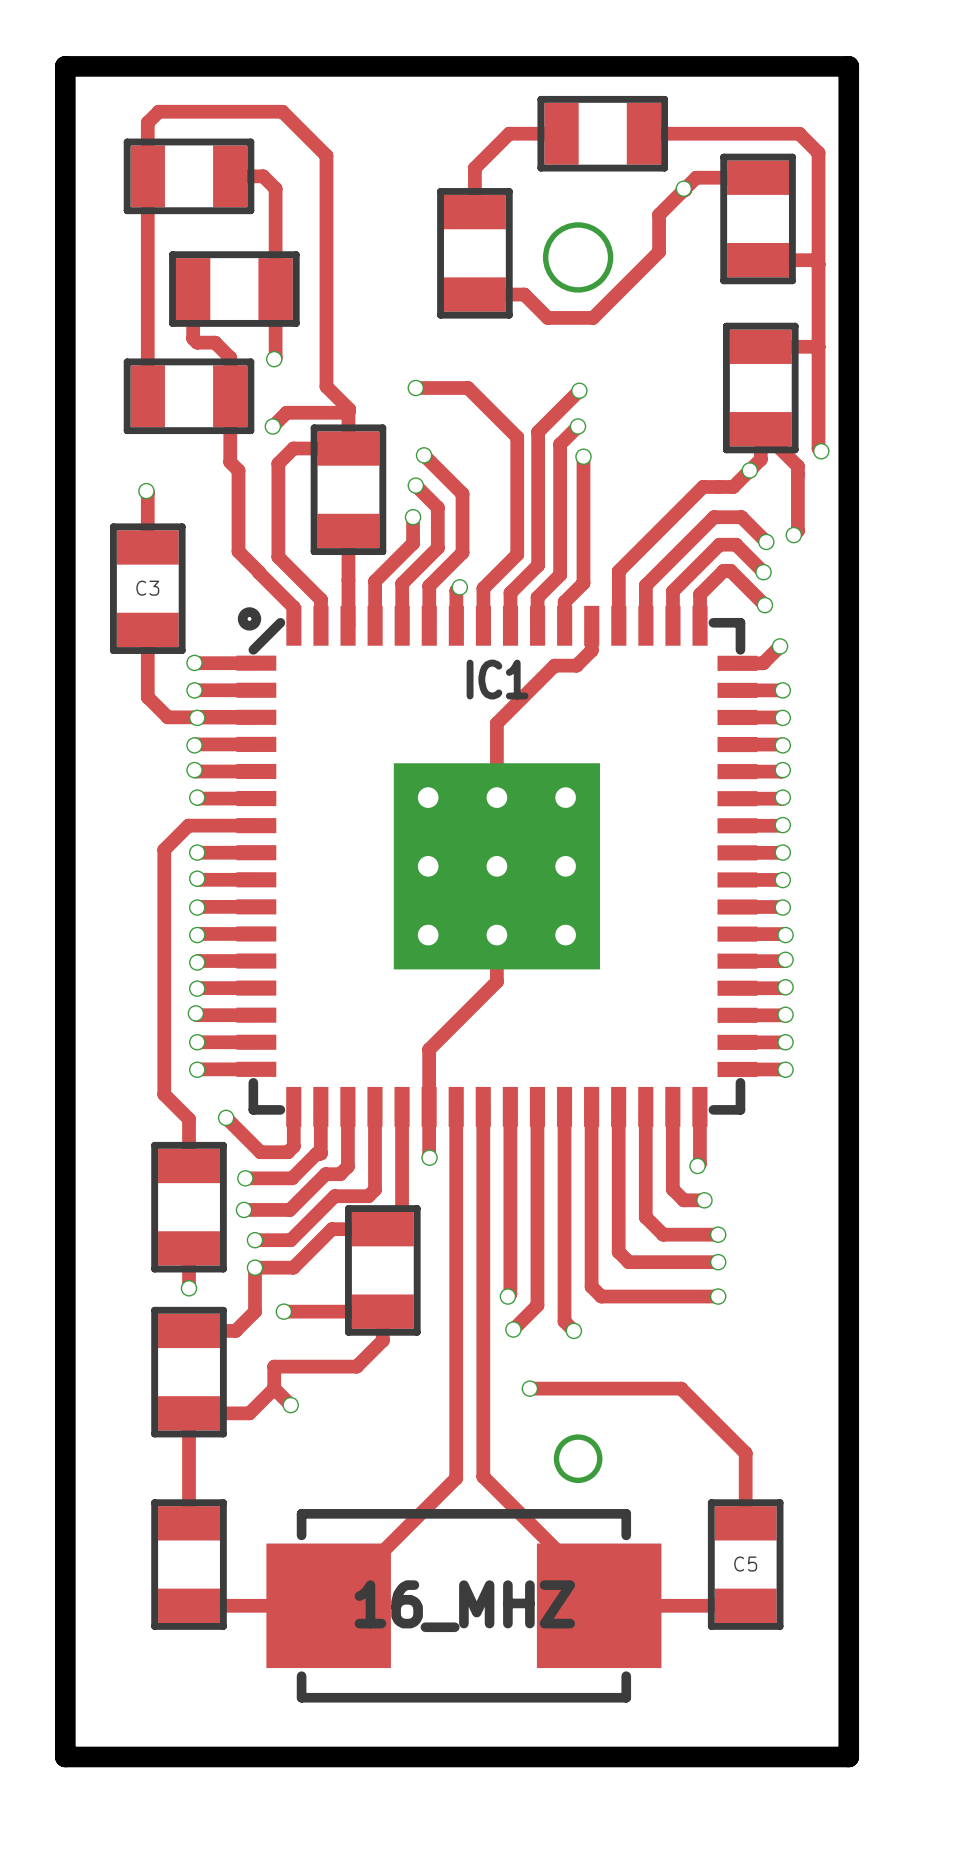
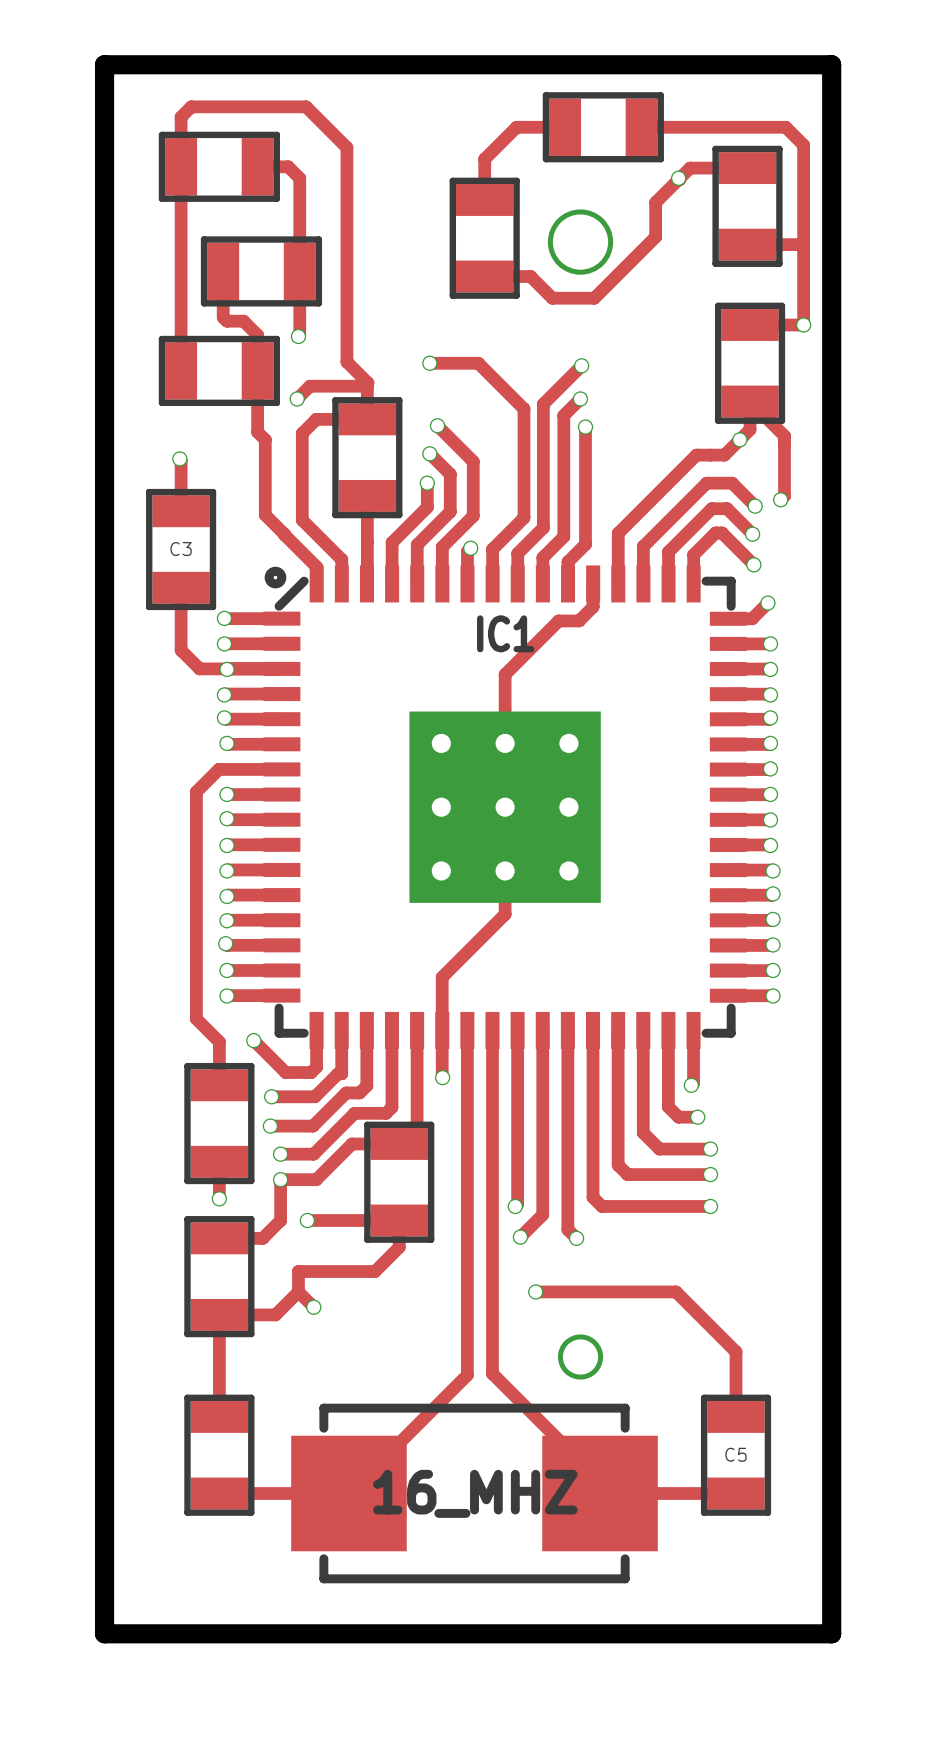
track: (818, 346) (818, 448) (821, 451) -> none
via position: (821, 451) -> (803, 324)

